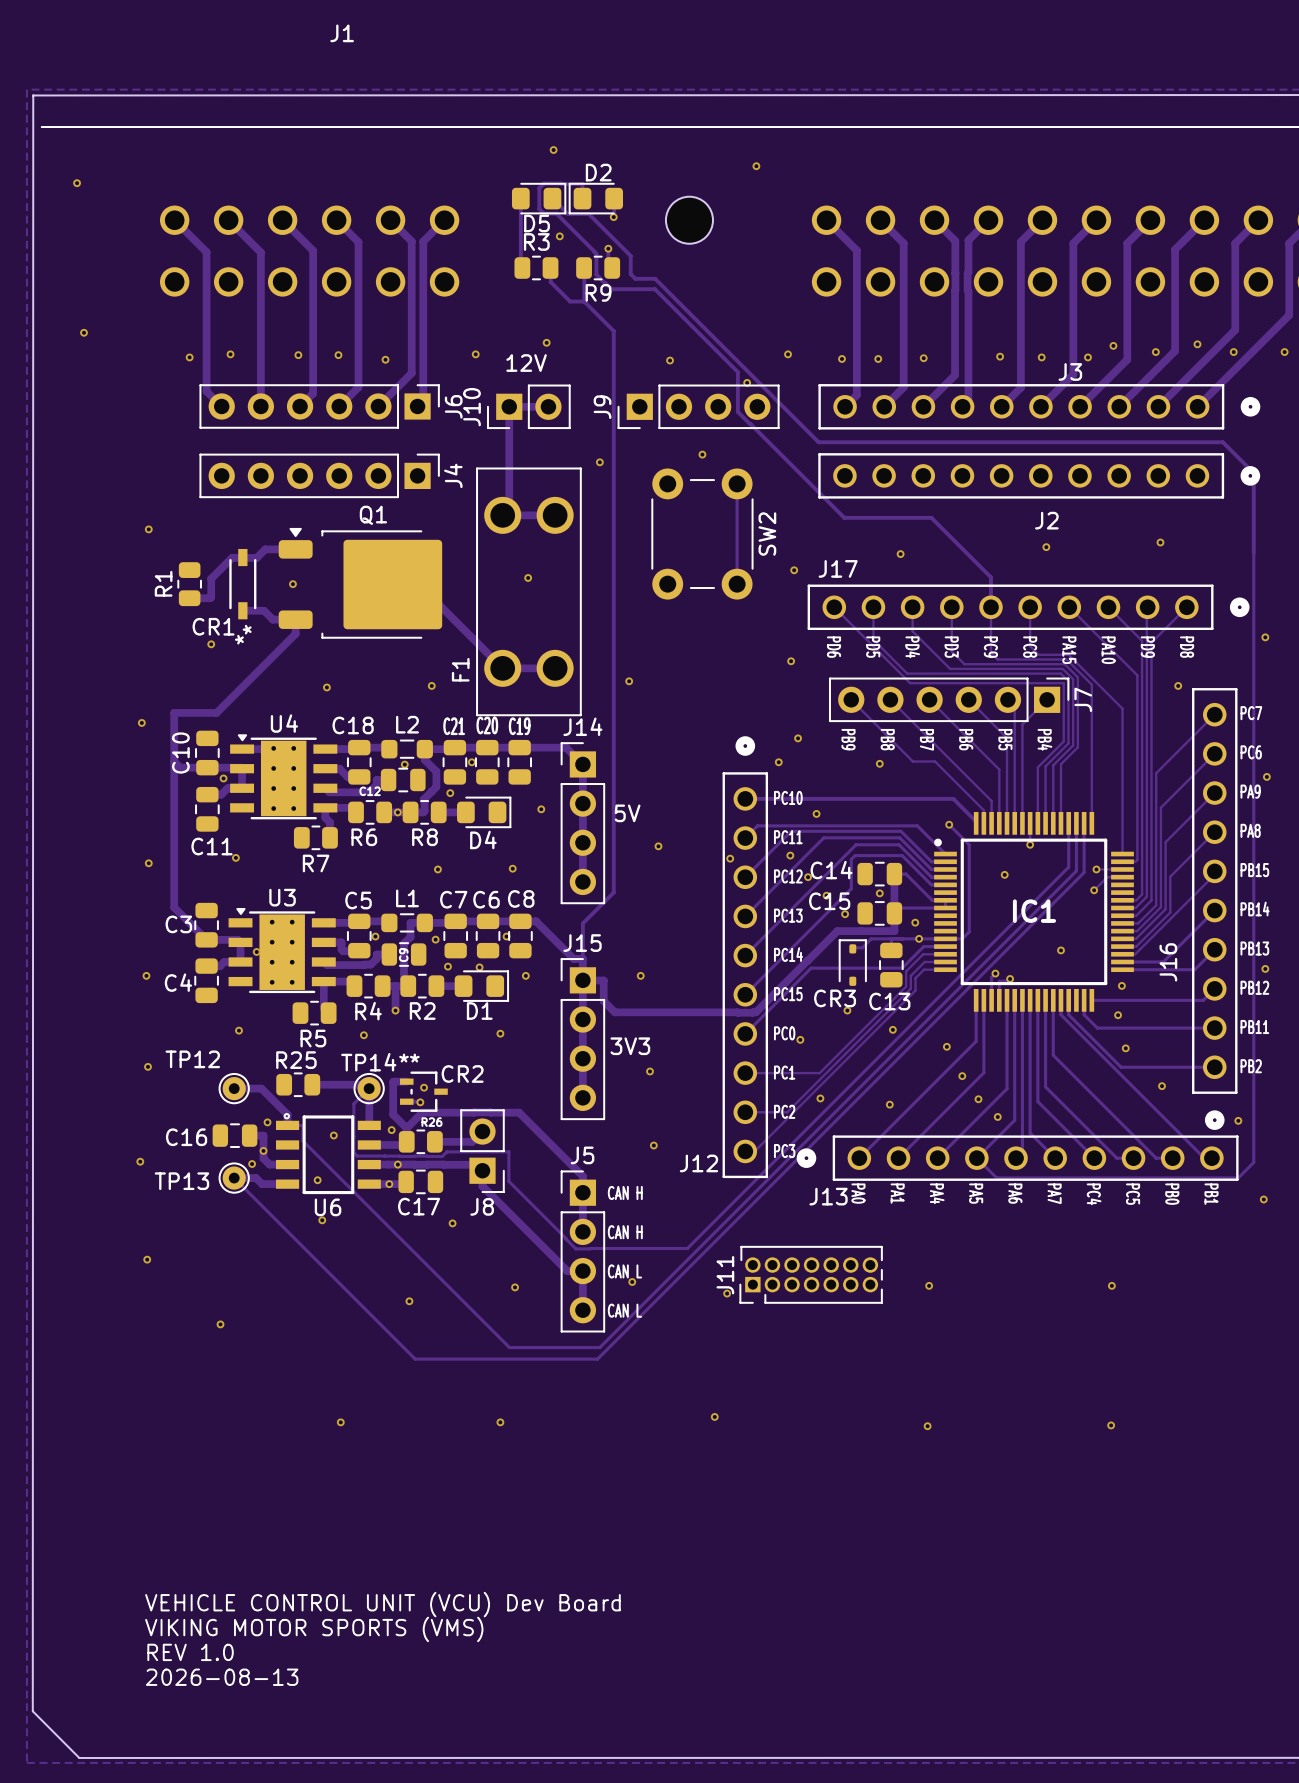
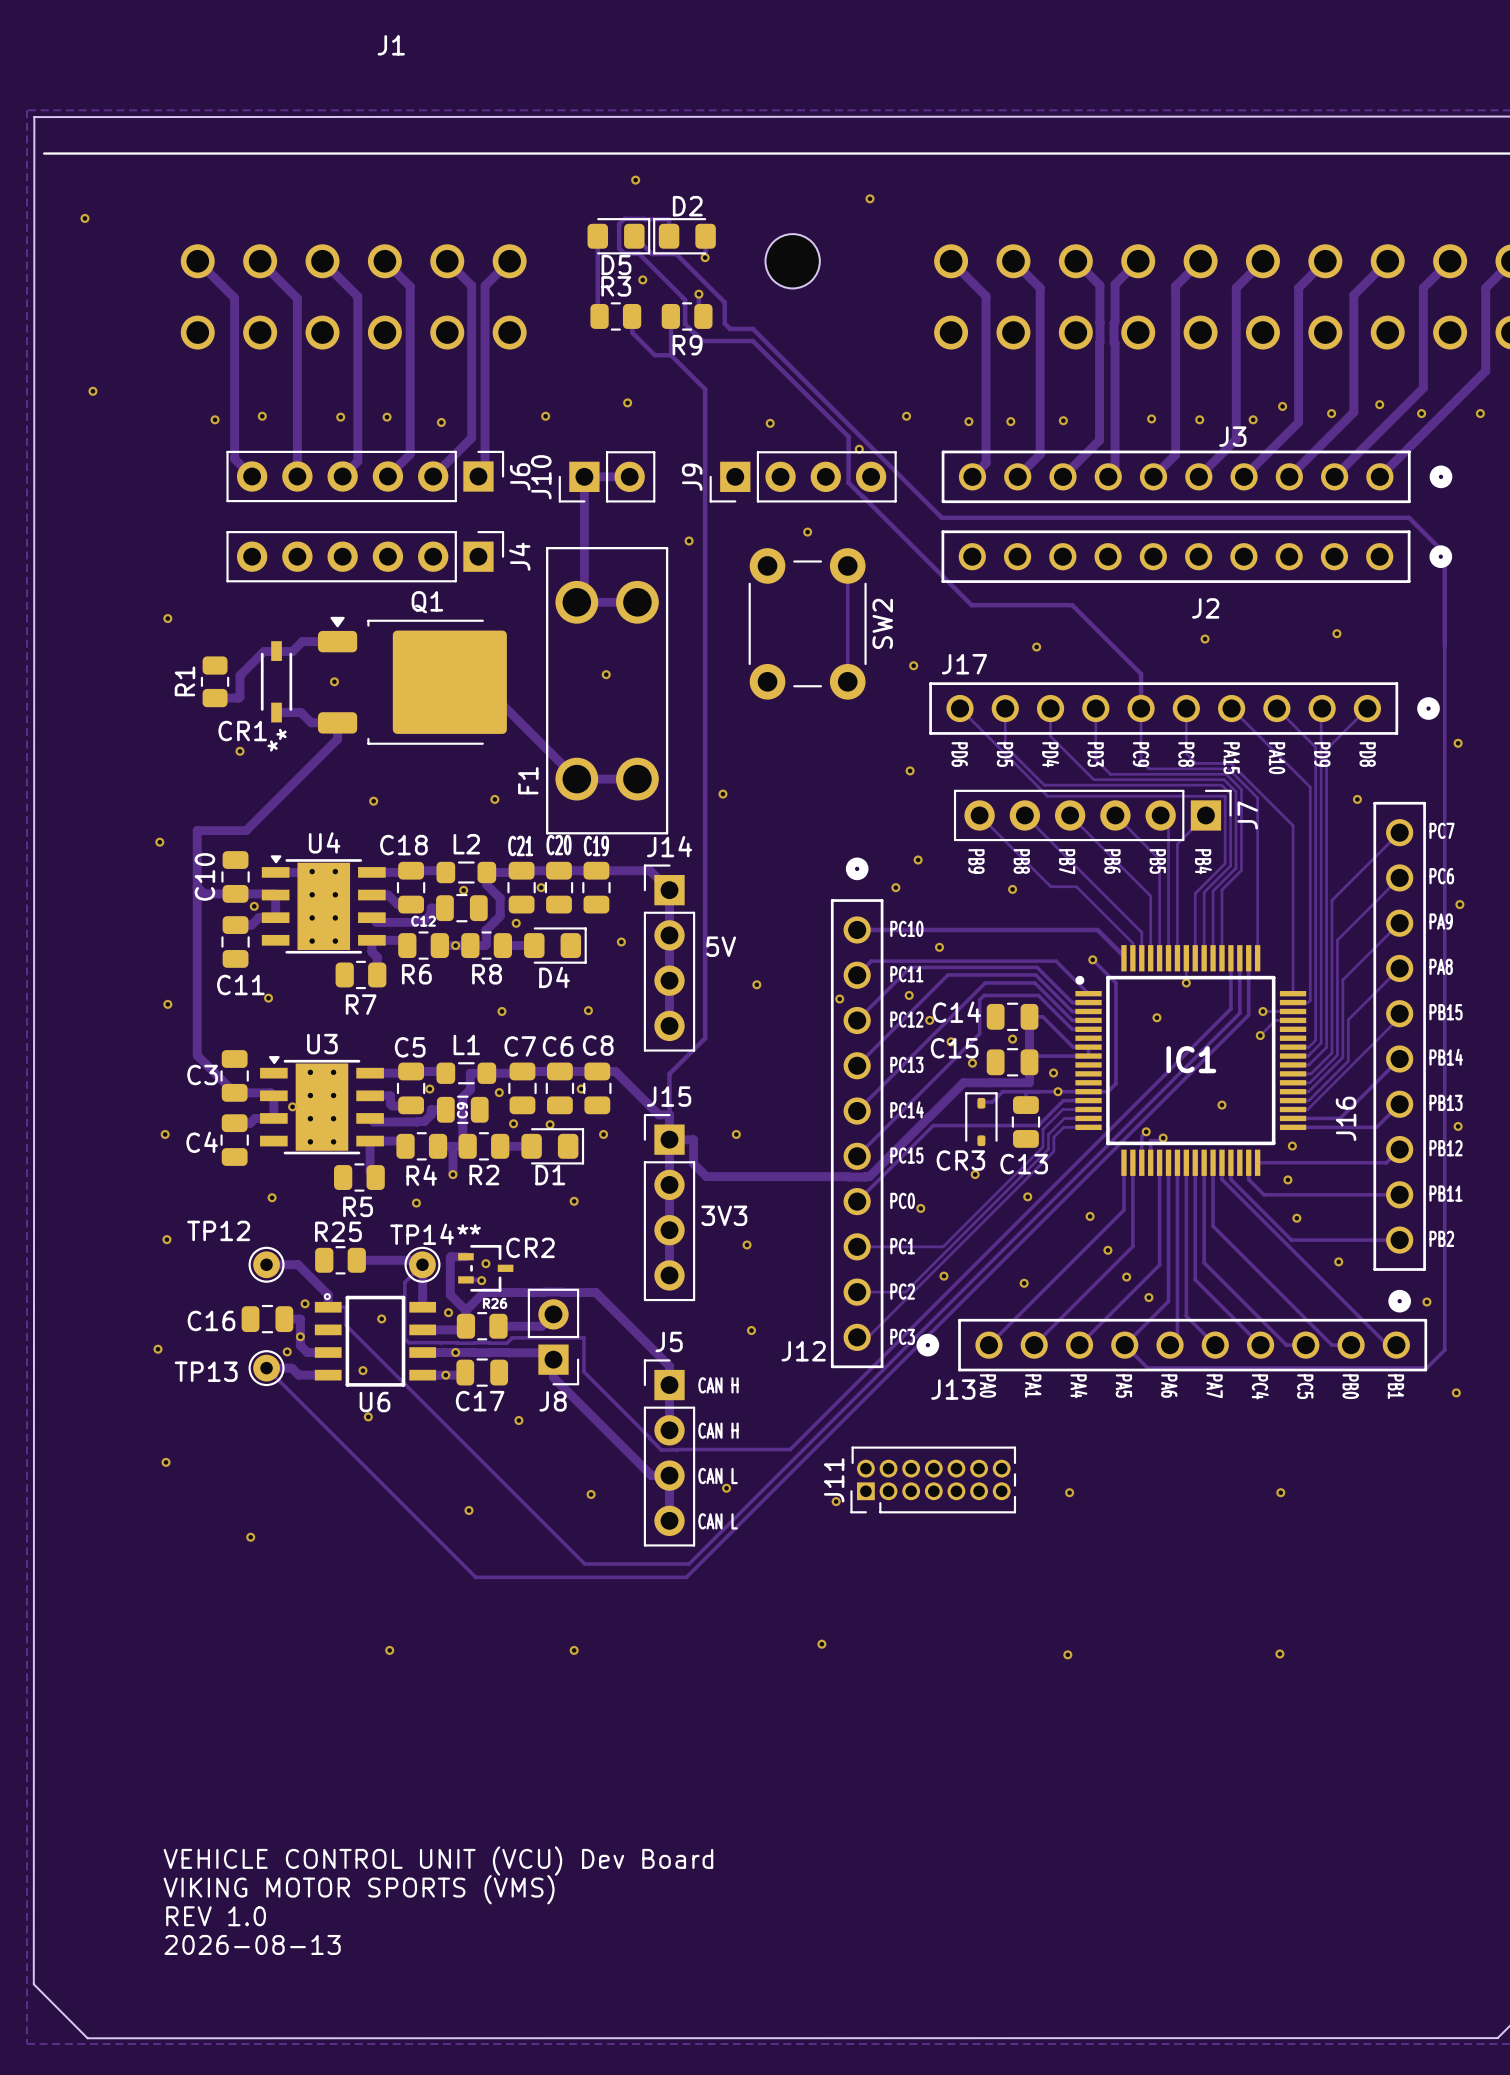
J10 value: 12V (526, 363) -> none

